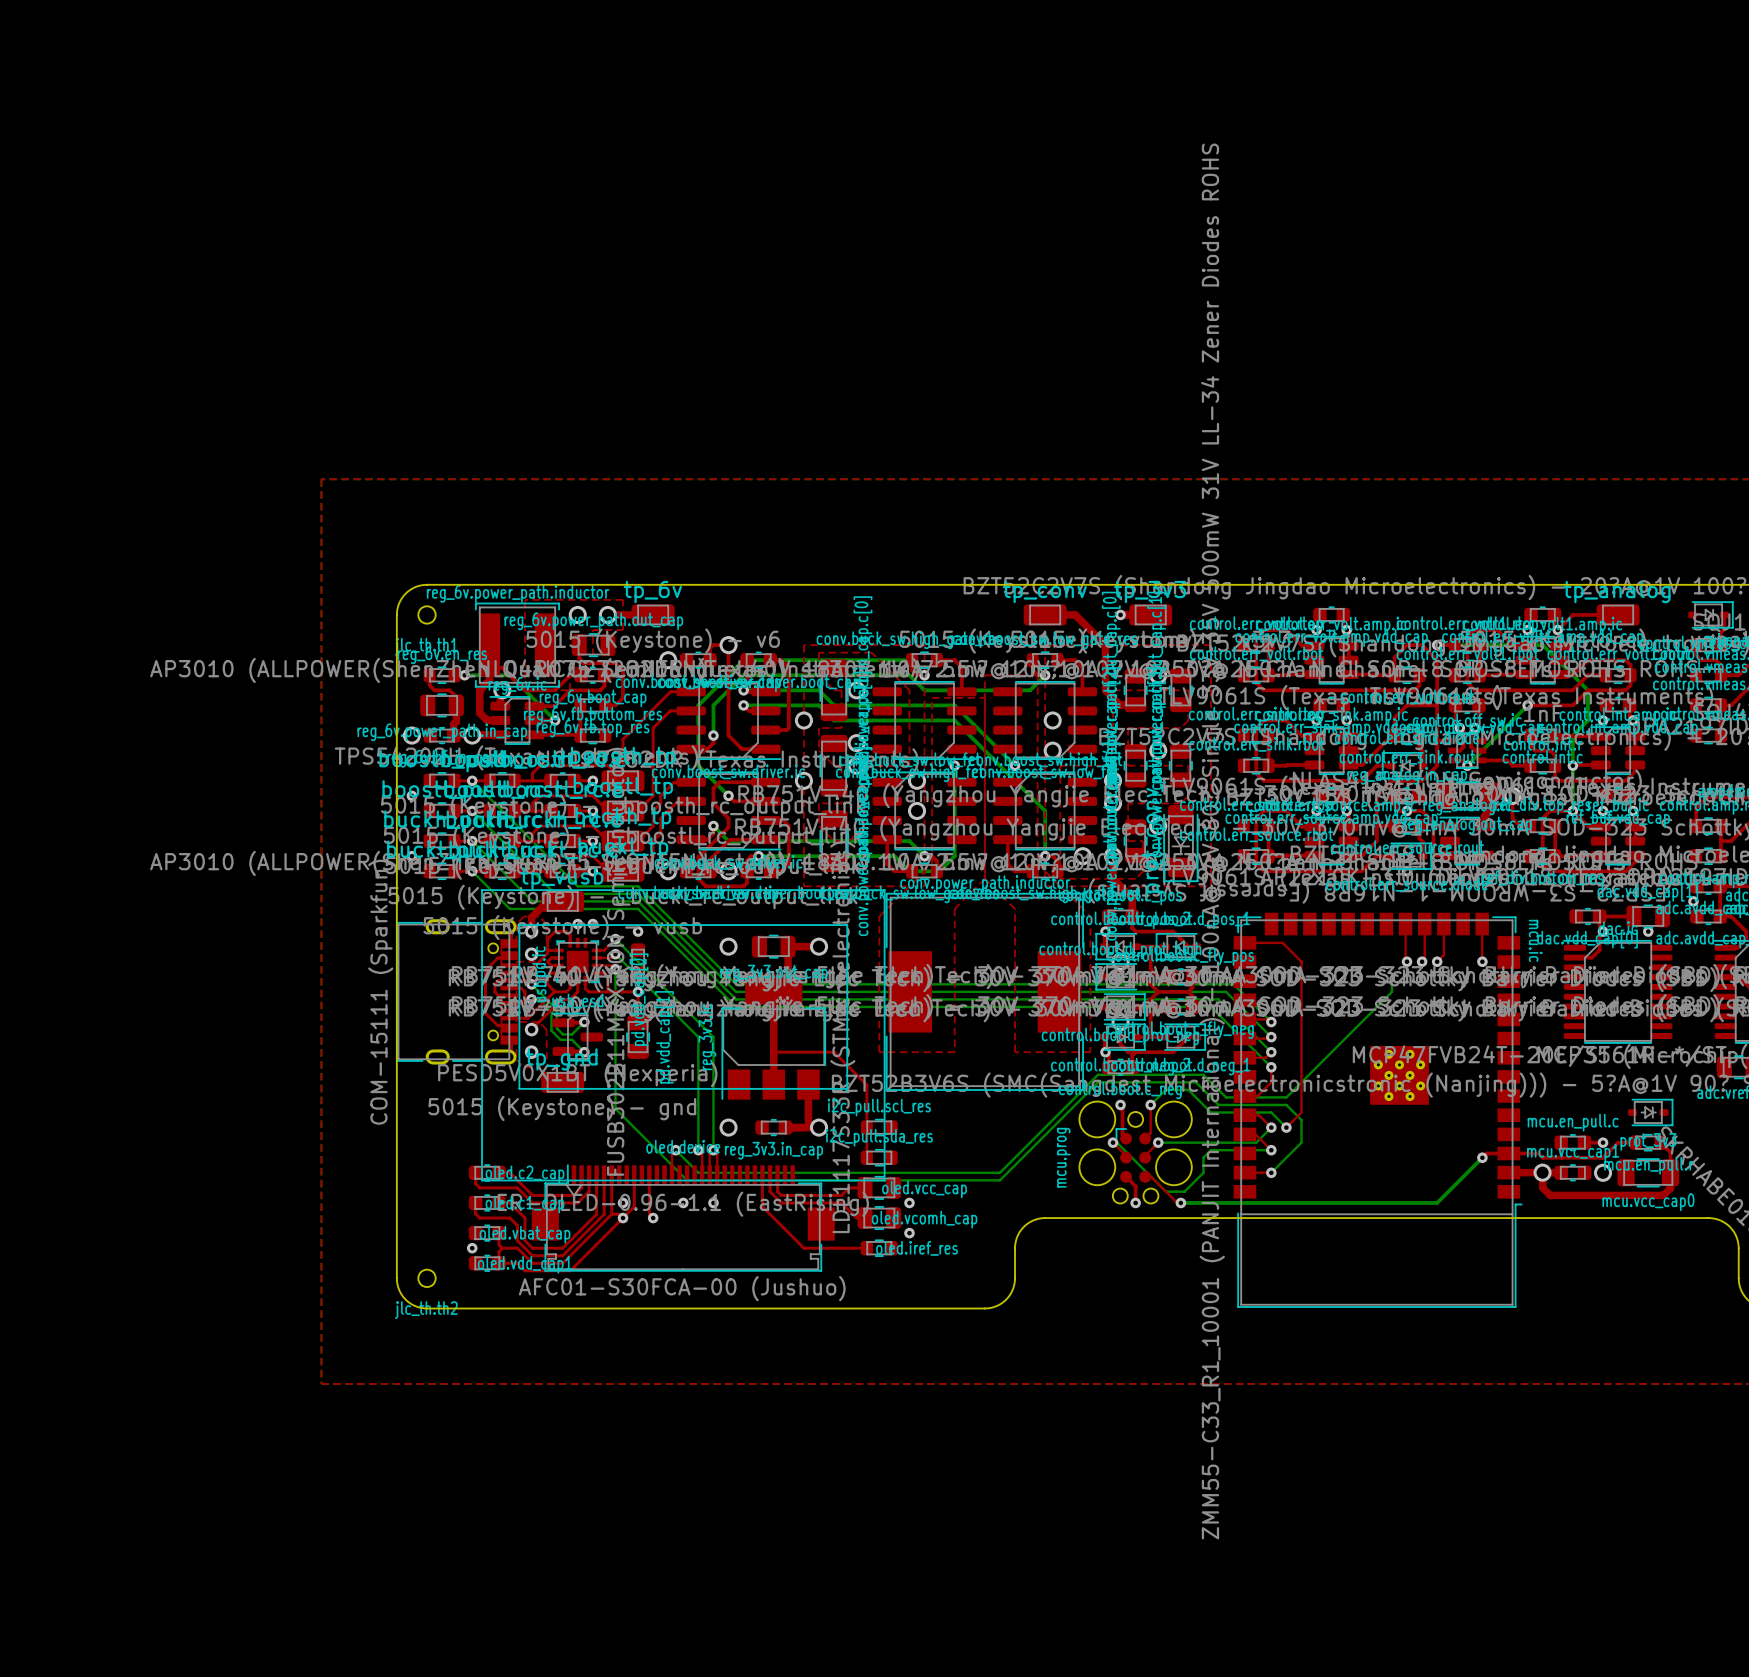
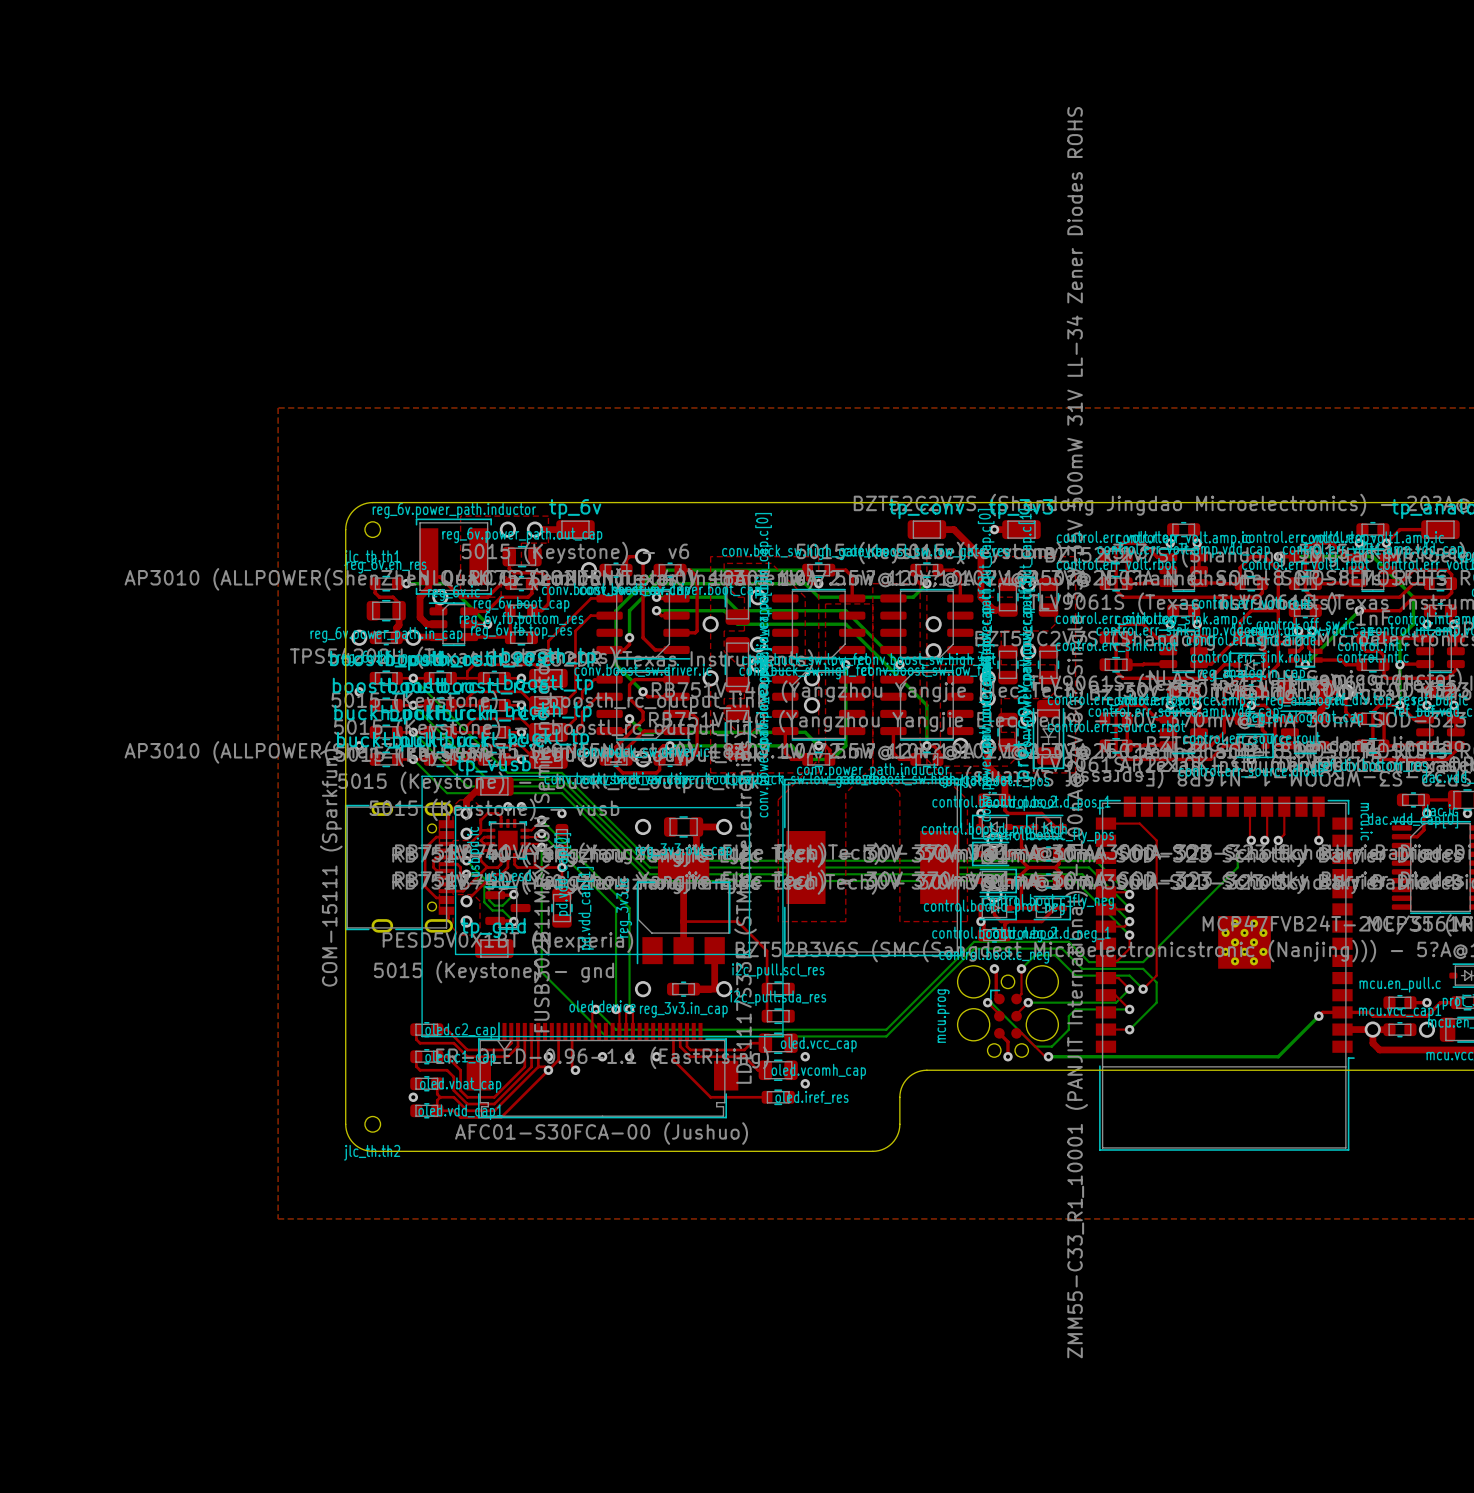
via: none -> (656, 1056)

